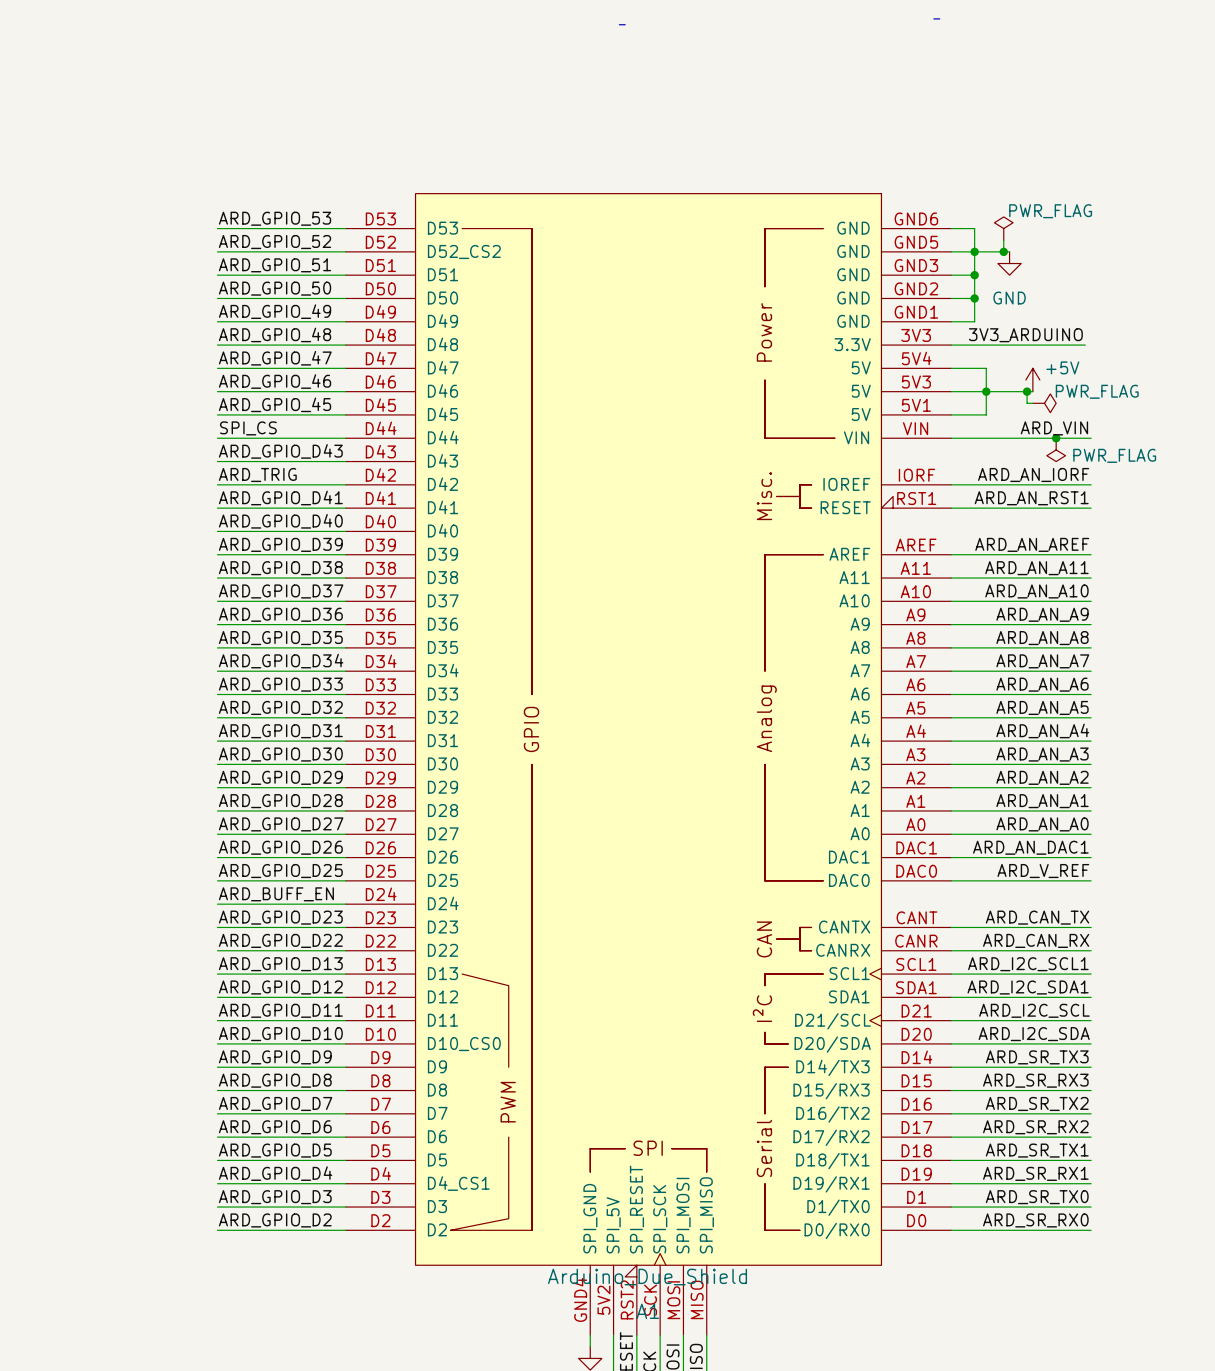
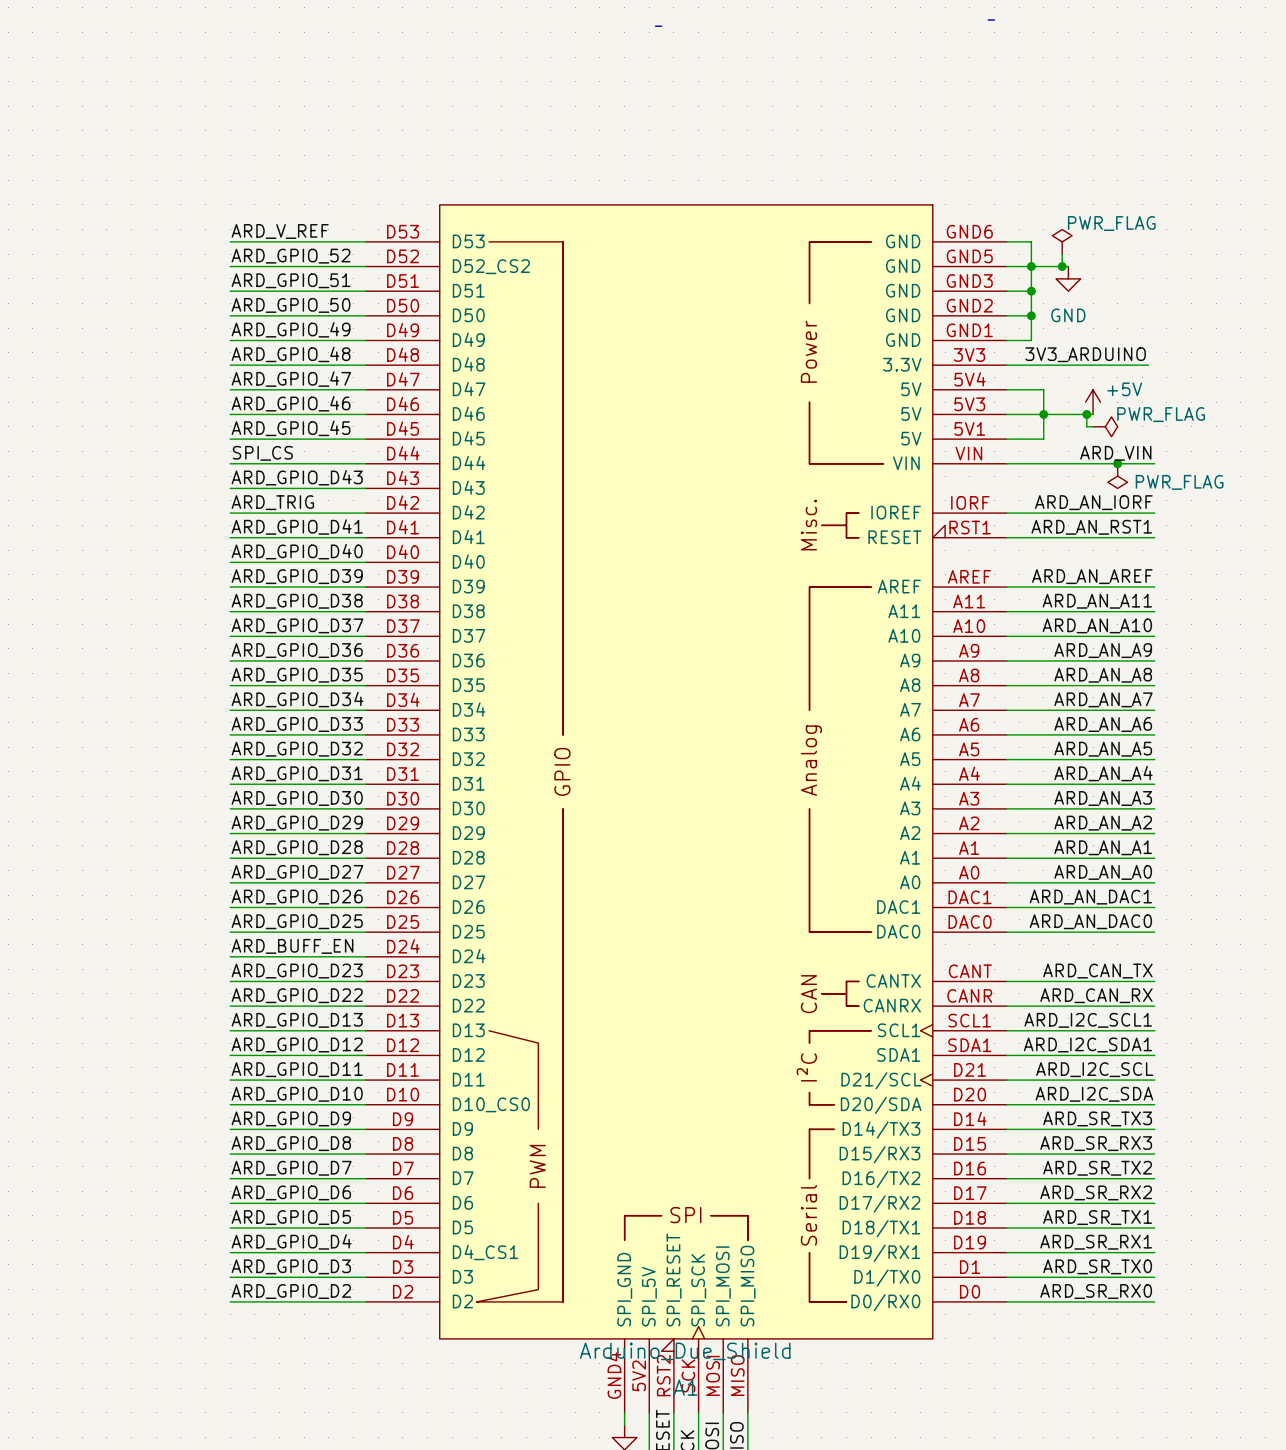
label: ARD_GPIO_53 (275, 218) -> ARD_V_REF (280, 231)
label: ARD_V_REF (1043, 871) -> ARD_AN_DAC0 (1090, 921)

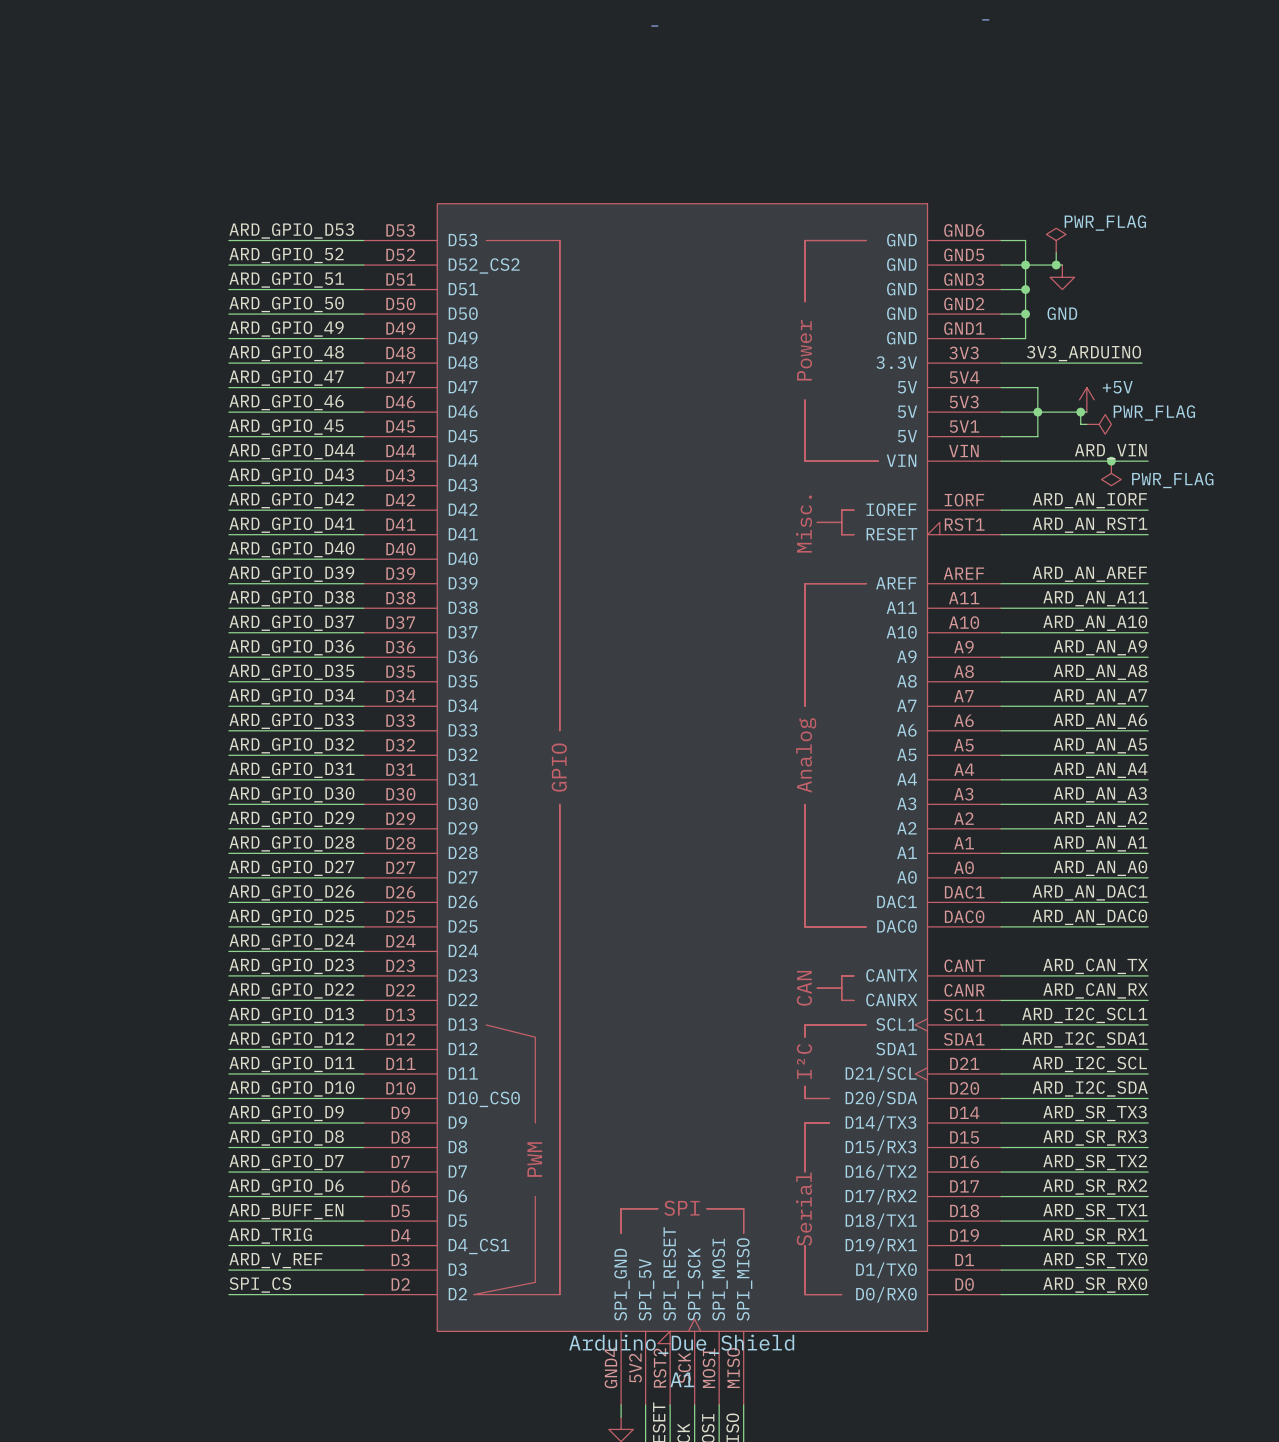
label: ARD_V_REF (280, 231) -> ARD_GPIO_D53 (291, 230)
label: SPI_CS (262, 453) -> ARD_GPIO_D44 (292, 451)
label: ARD_TRIG (272, 502) -> ARD_GPIO_D42 (291, 500)
label: ARD_BUFF_EN (292, 946) -> ARD_GPIO_D24 (292, 941)
label: ARD_GPIO_D5 (291, 1217) -> ARD_BUFF_EN (286, 1211)
label: ARD_GPIO_D4 (291, 1241) -> ARD_TRIG (270, 1236)
label: ARD_GPIO_D3 (291, 1266) -> ARD_V_REF (275, 1260)
label: ARD_GPIO_D2 (291, 1291) -> SPI_CS (260, 1285)

